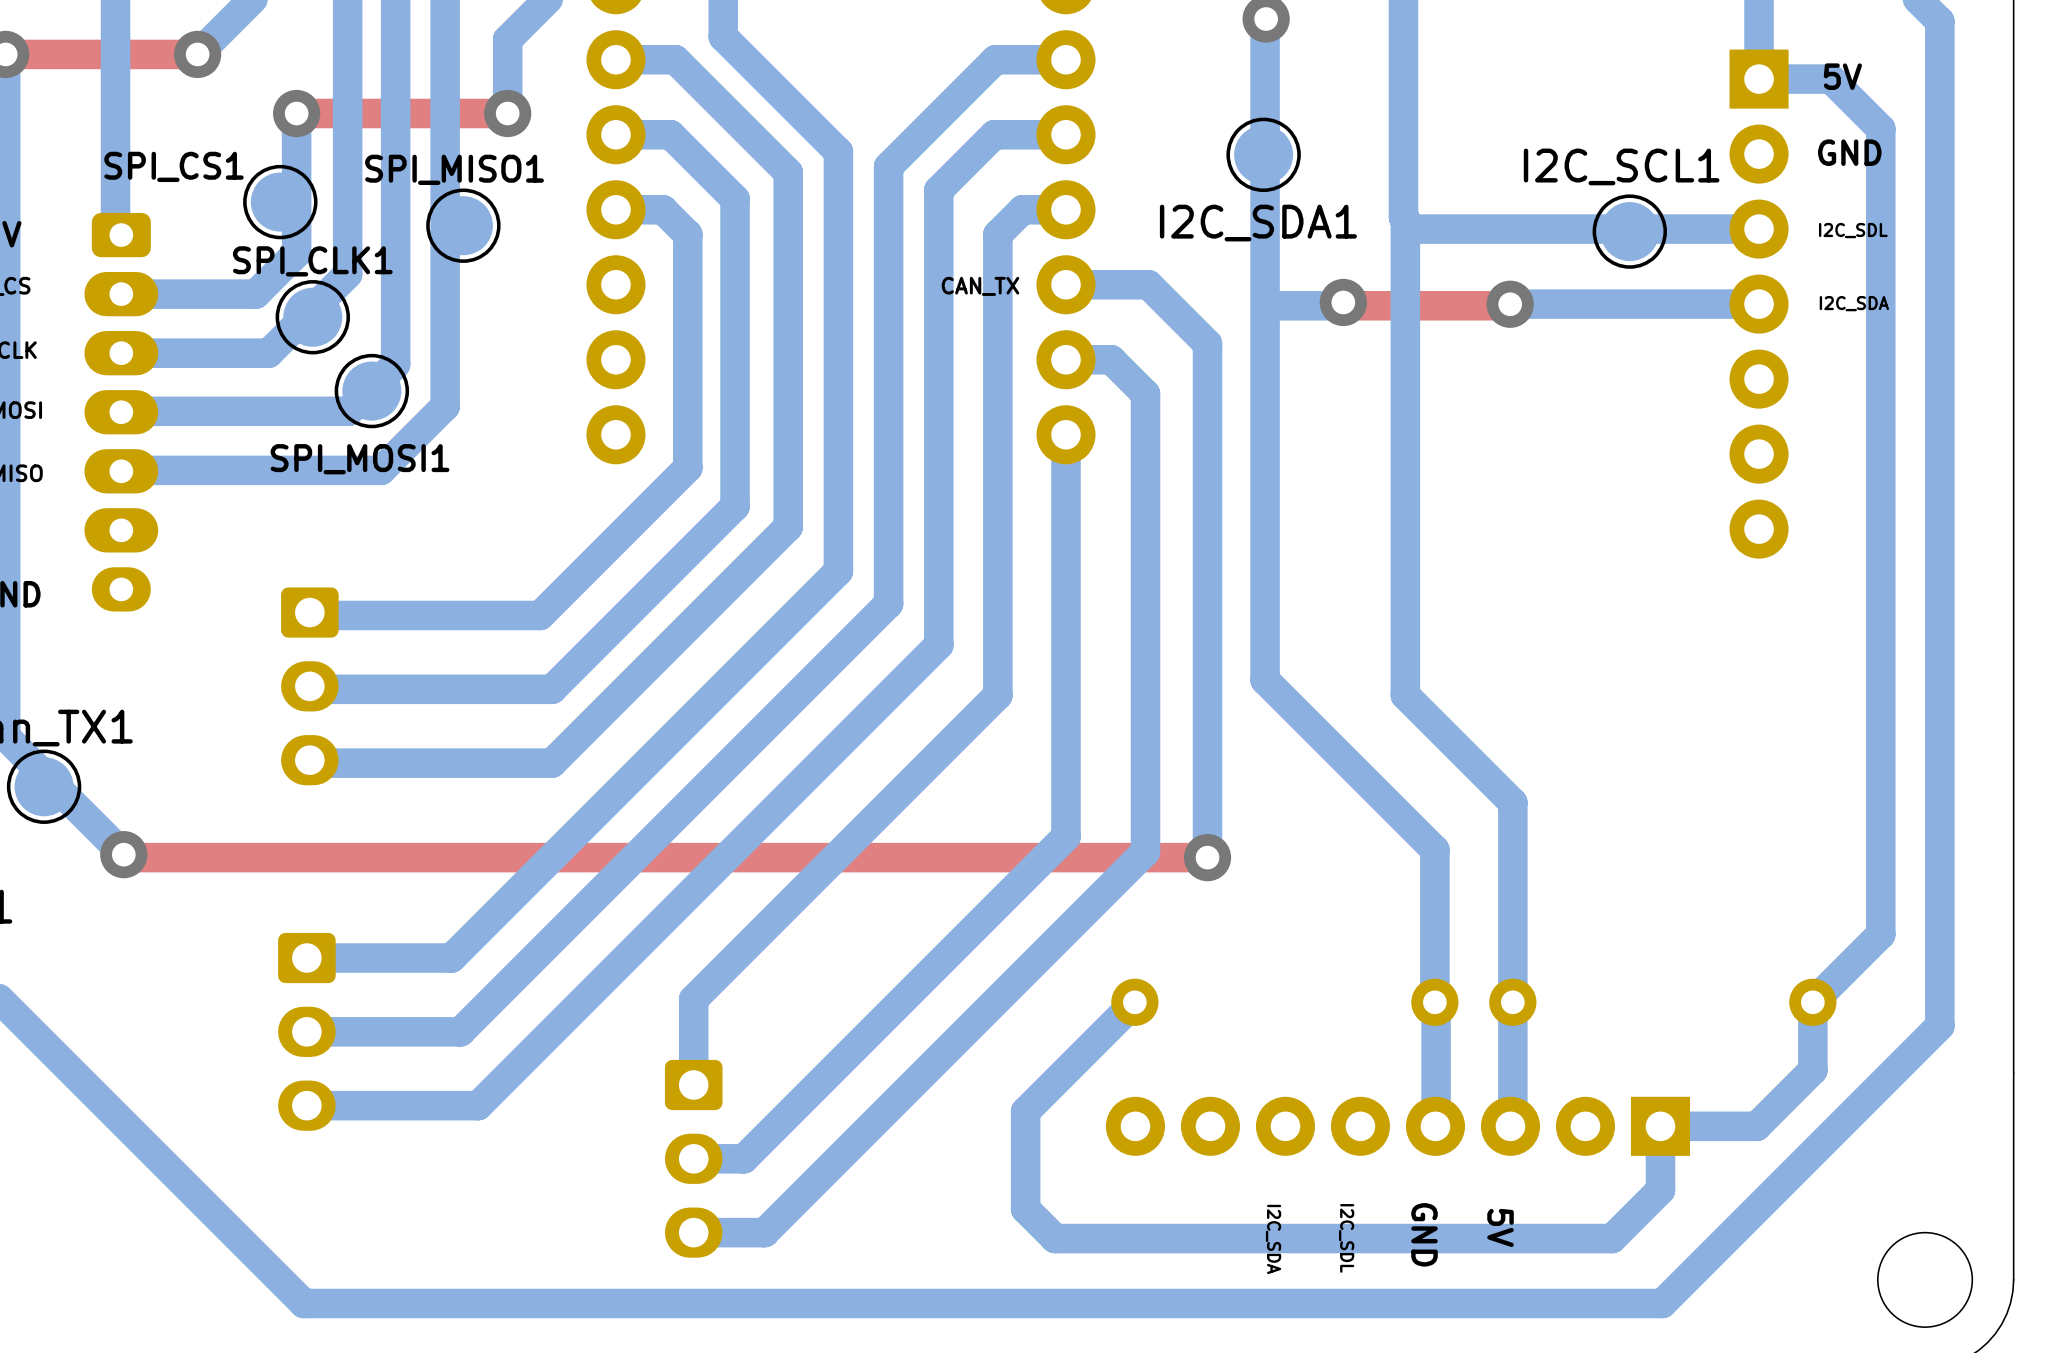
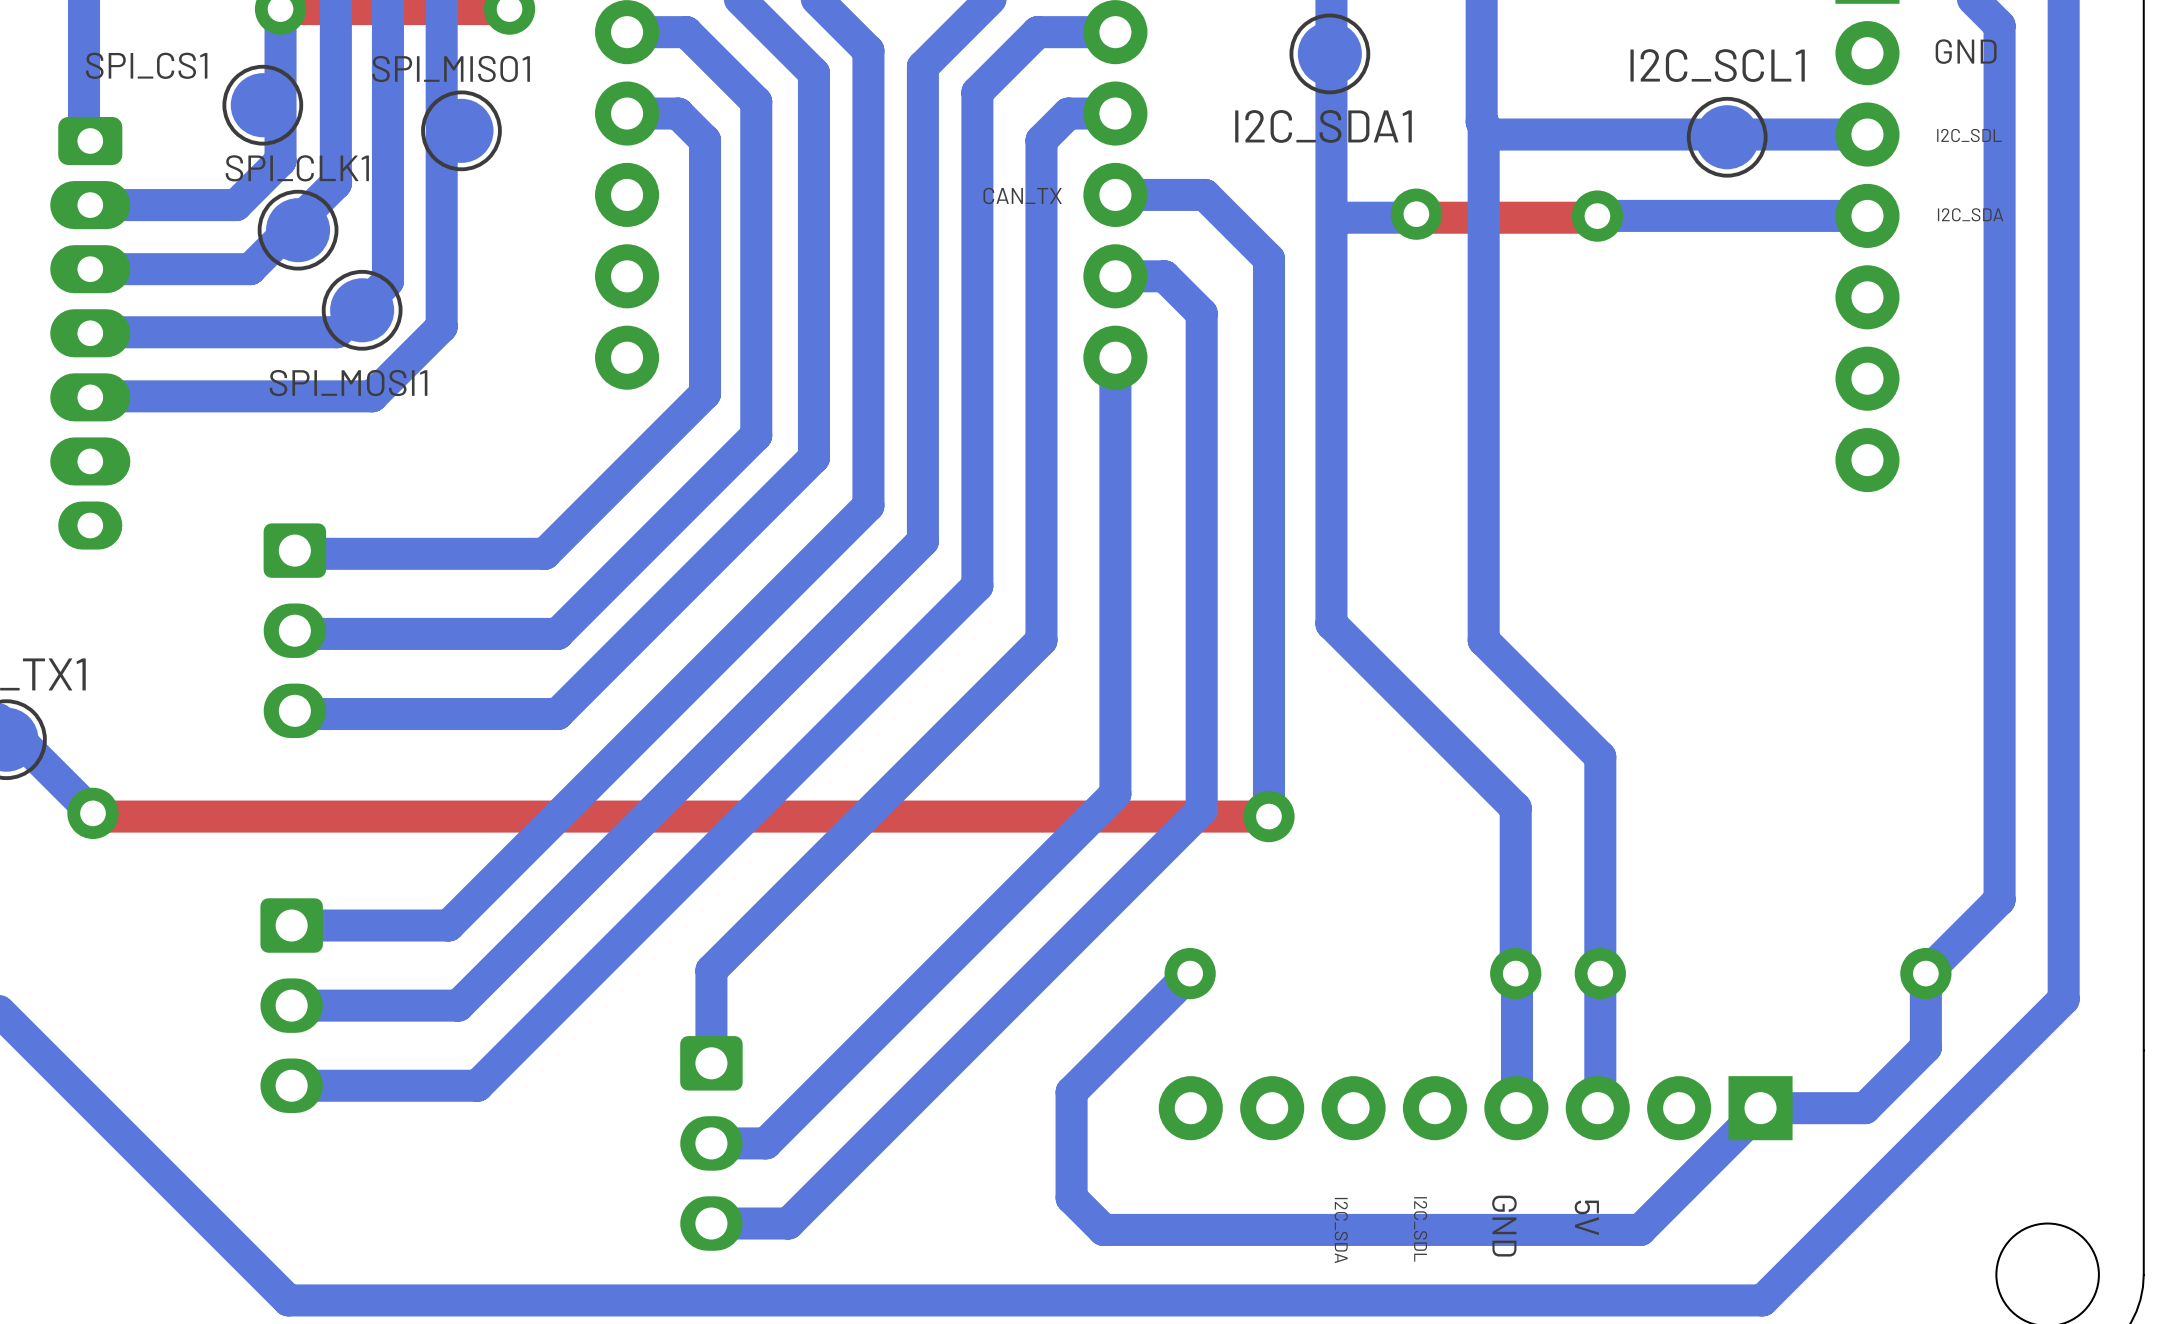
bottom track: (1660, 1127) (1660, 1190) (1612, 1238) (1549, 1238) -> (1760, 1109) (1640, 1229)

